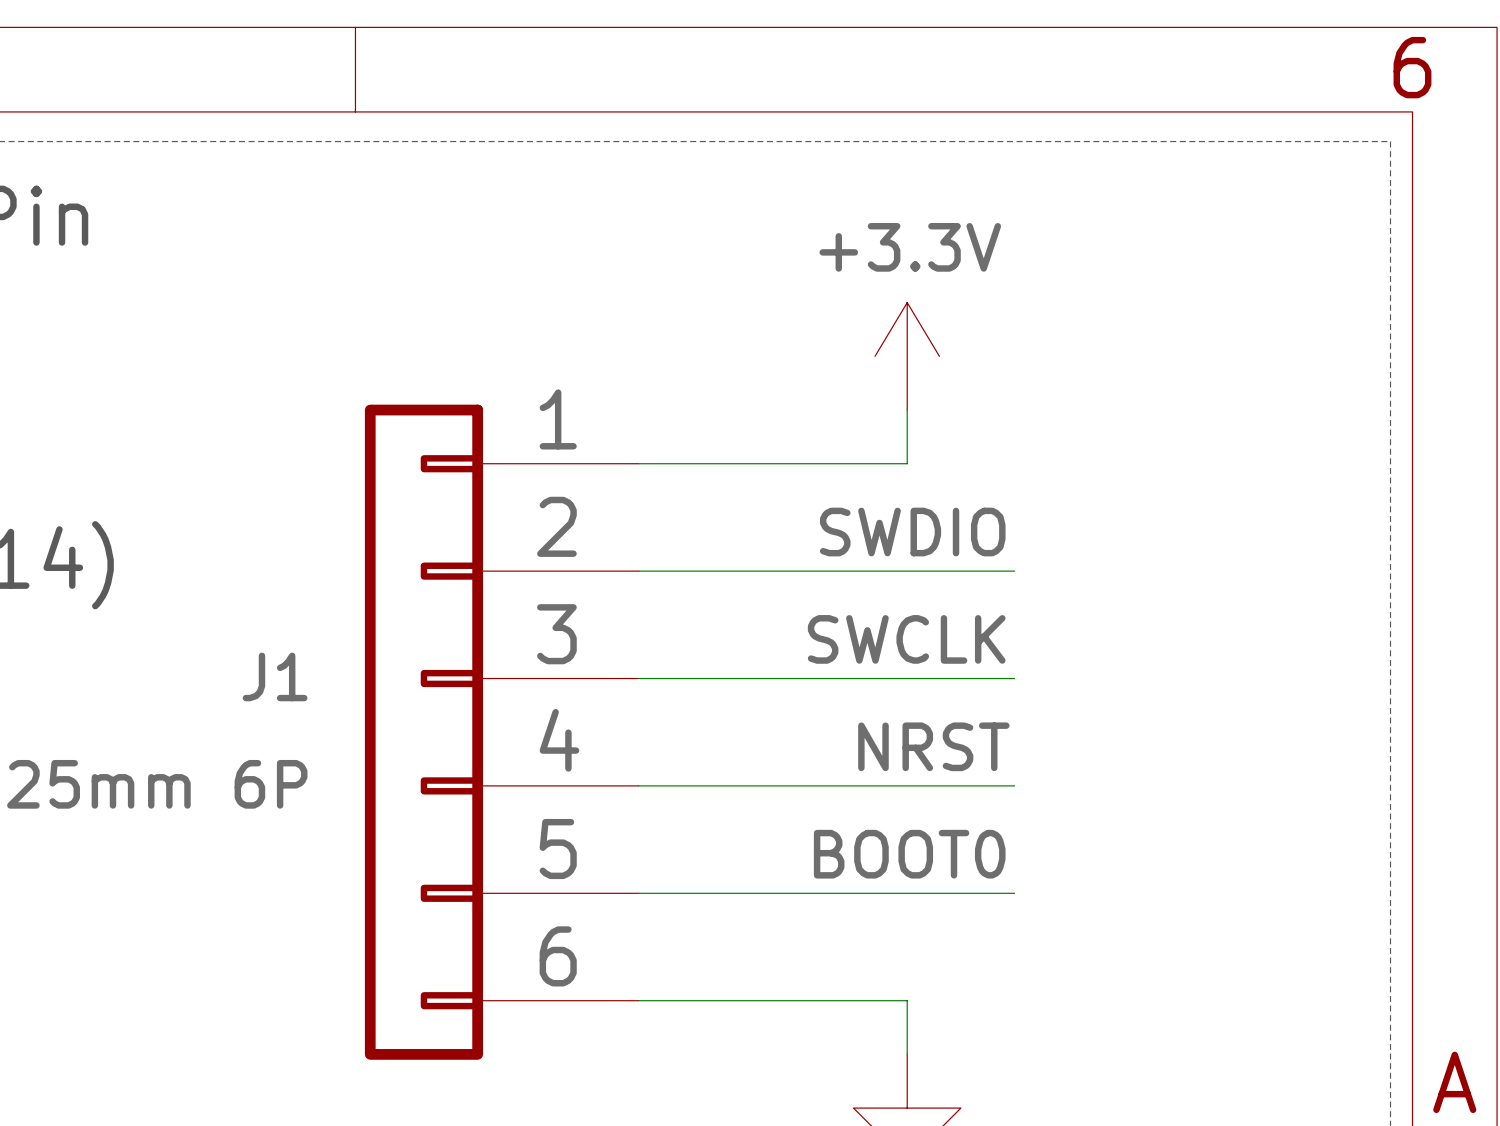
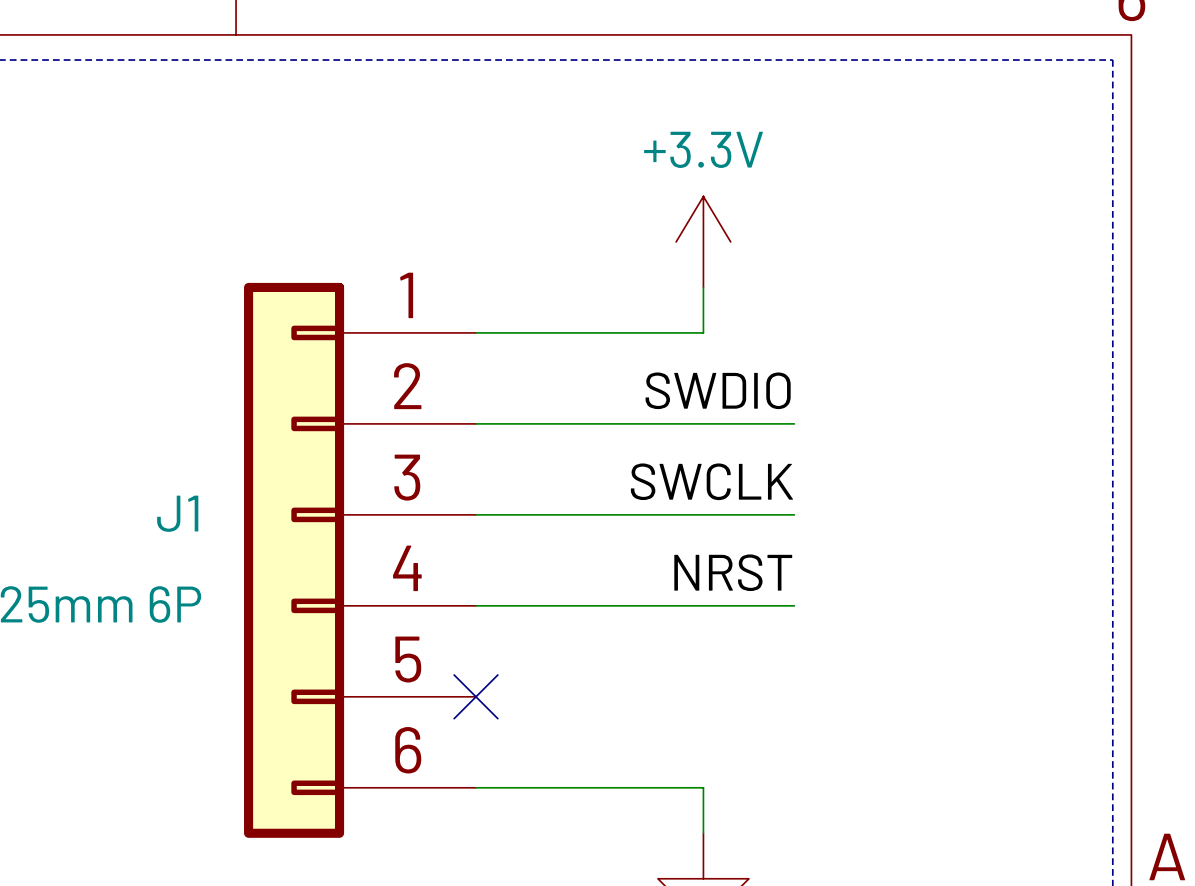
label: BOOT0 (909, 854) -> none
wire: (638, 893) (1014, 893) -> none
no-connect mark: none -> (476, 696)

